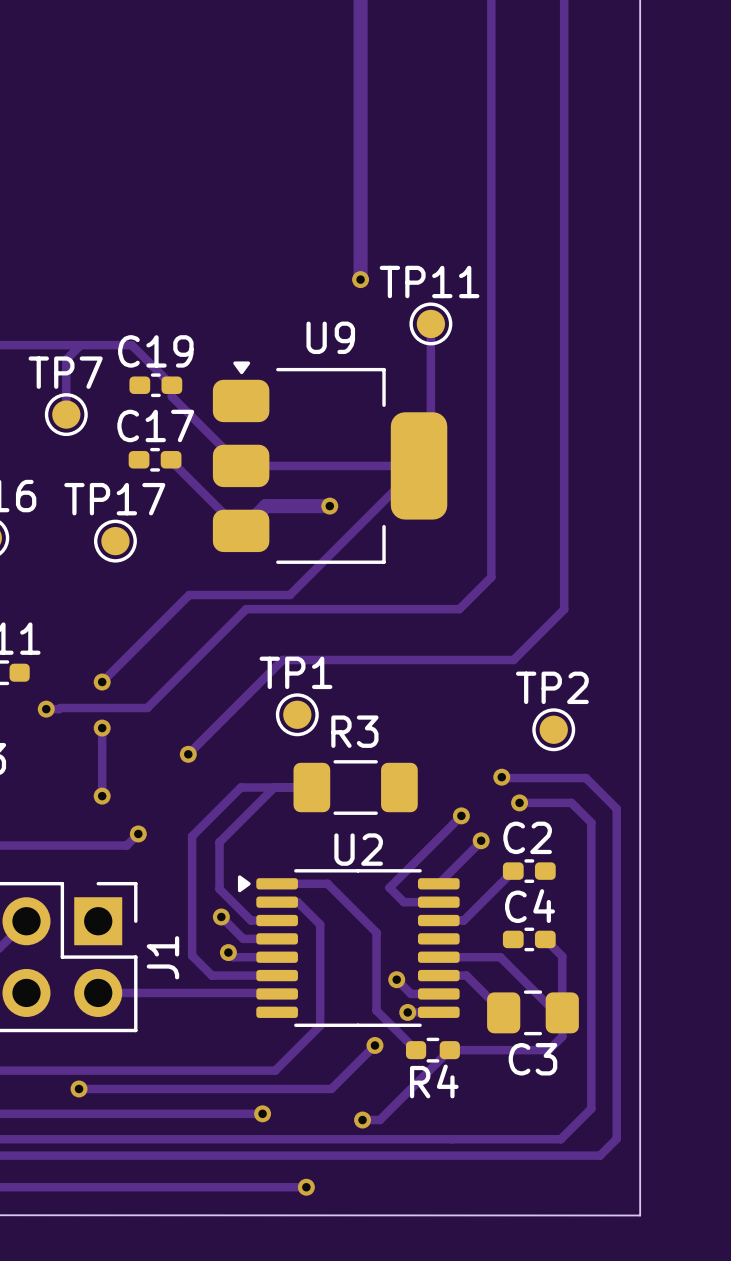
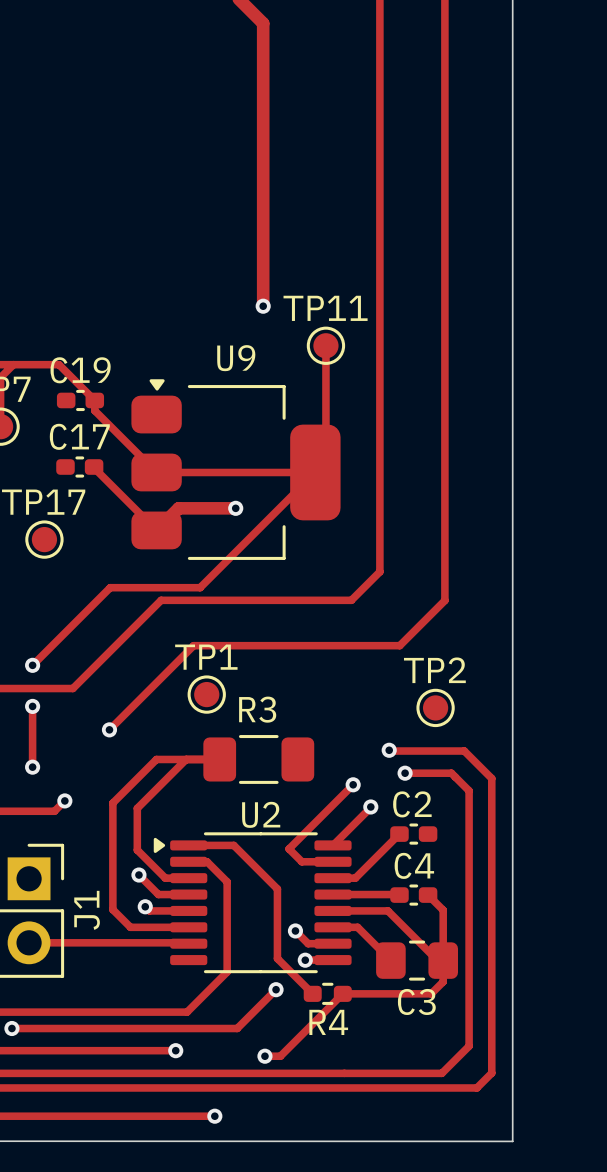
track: none -> (333, 894) (398, 894)

